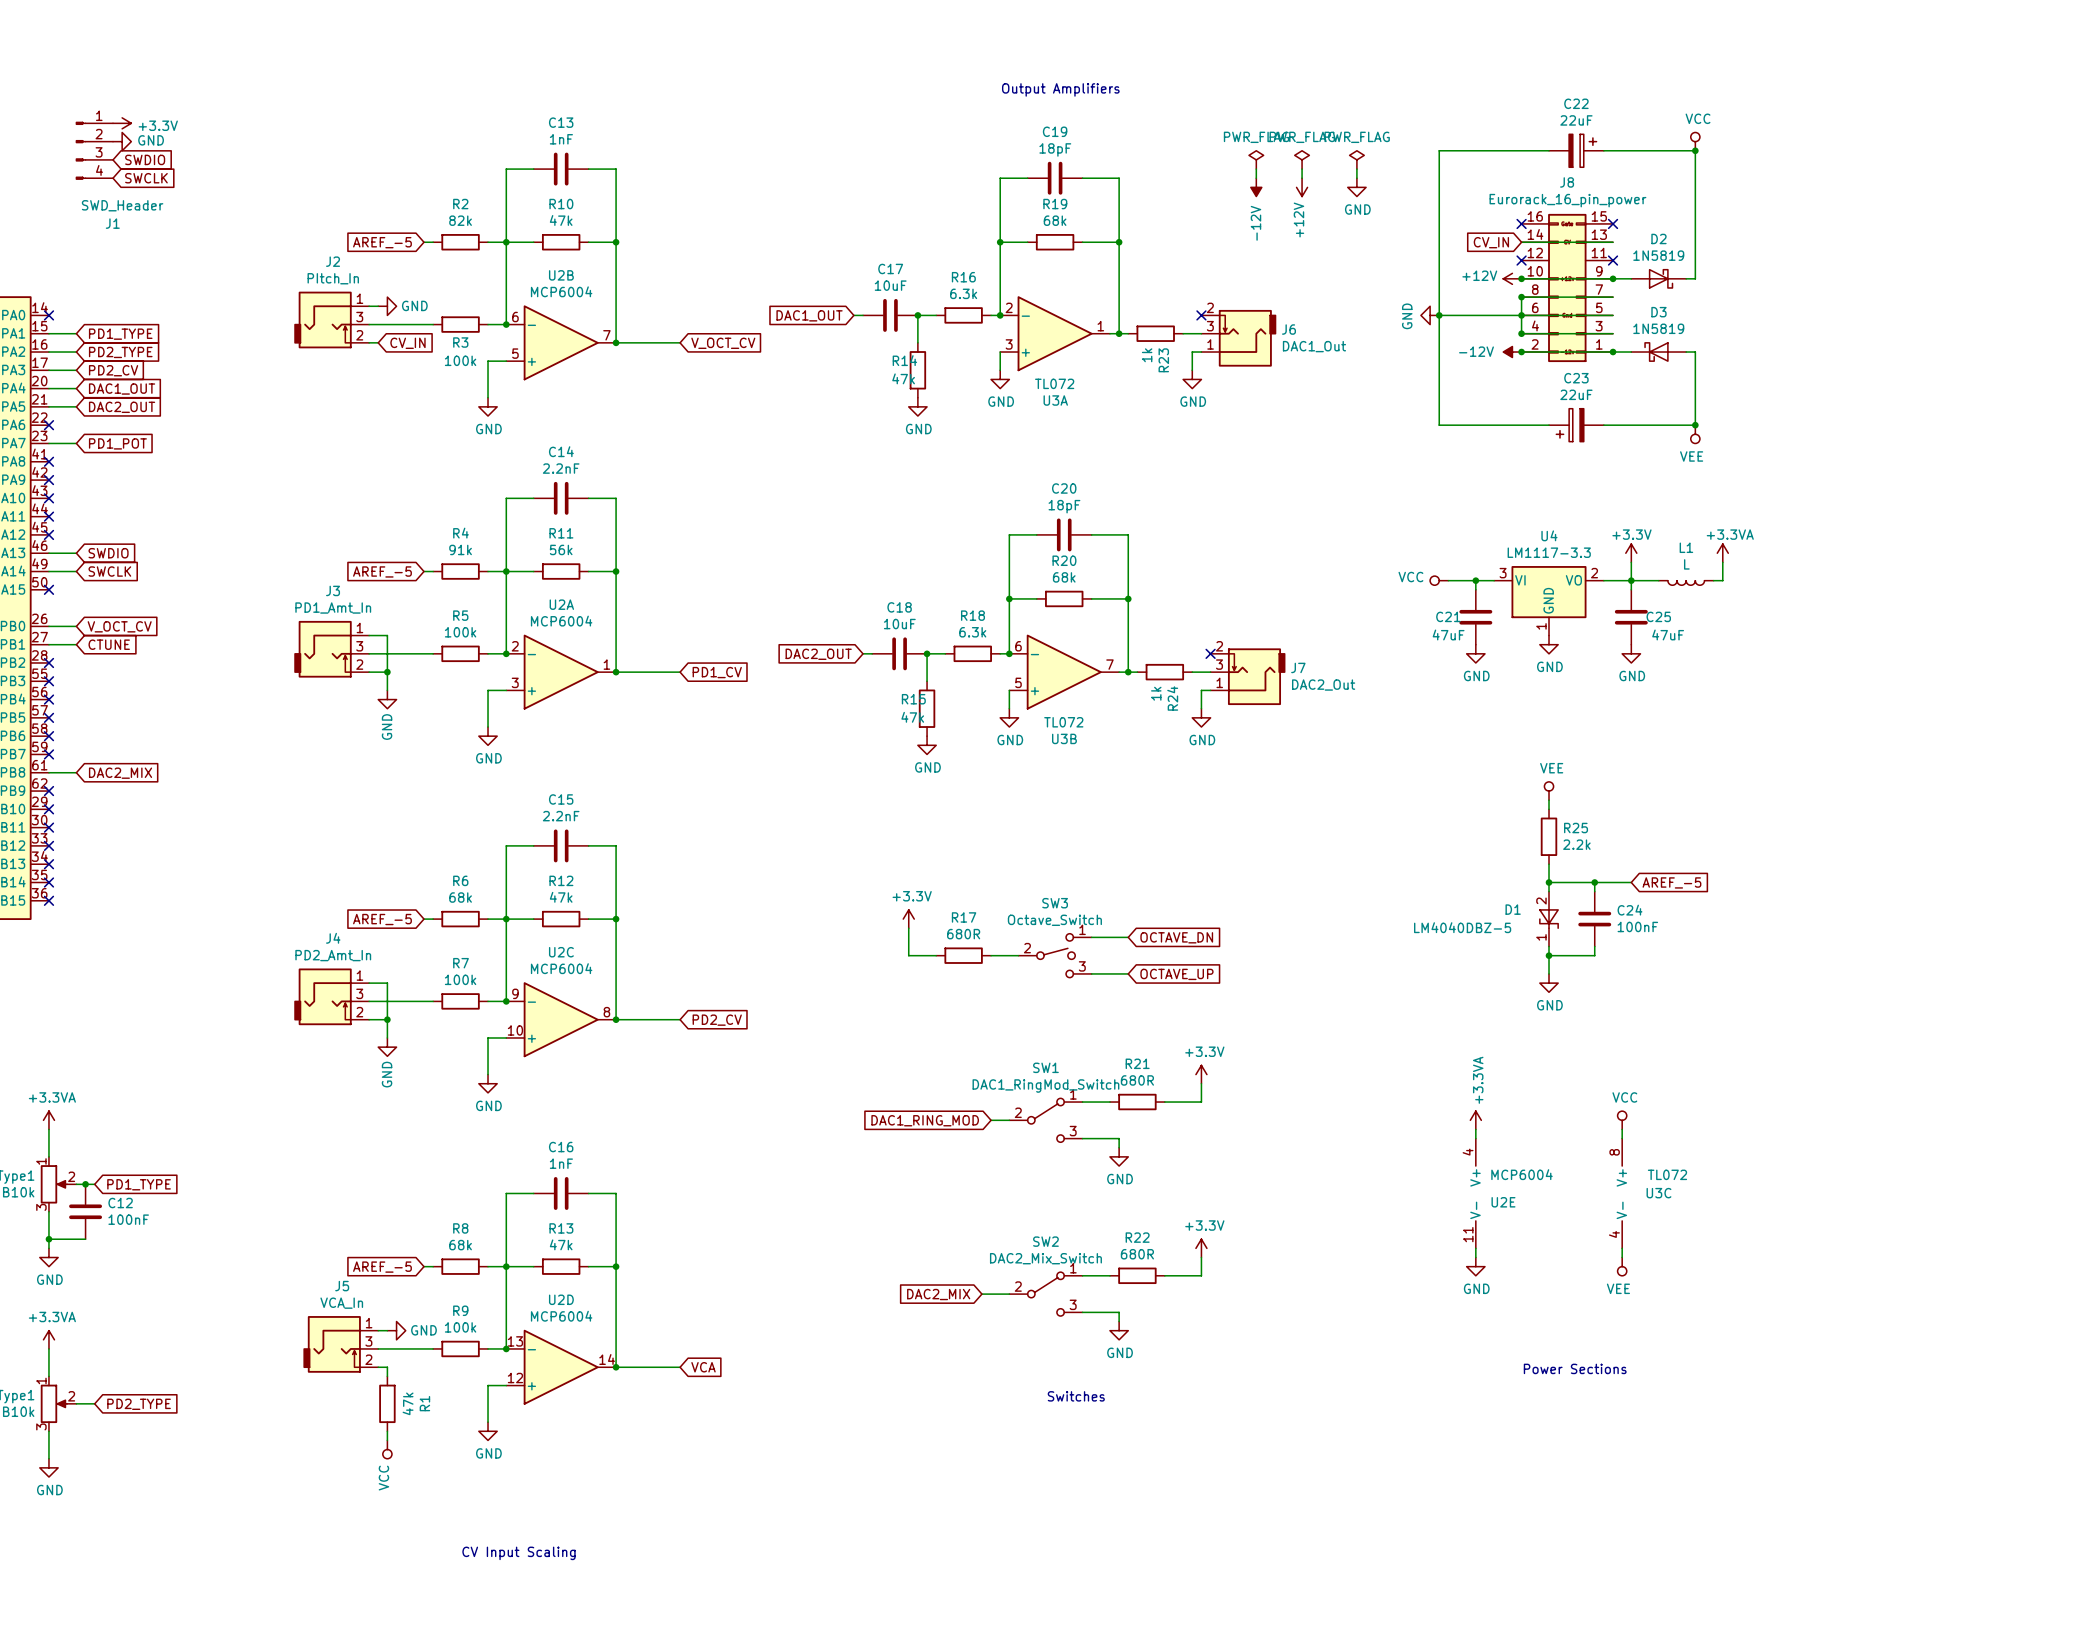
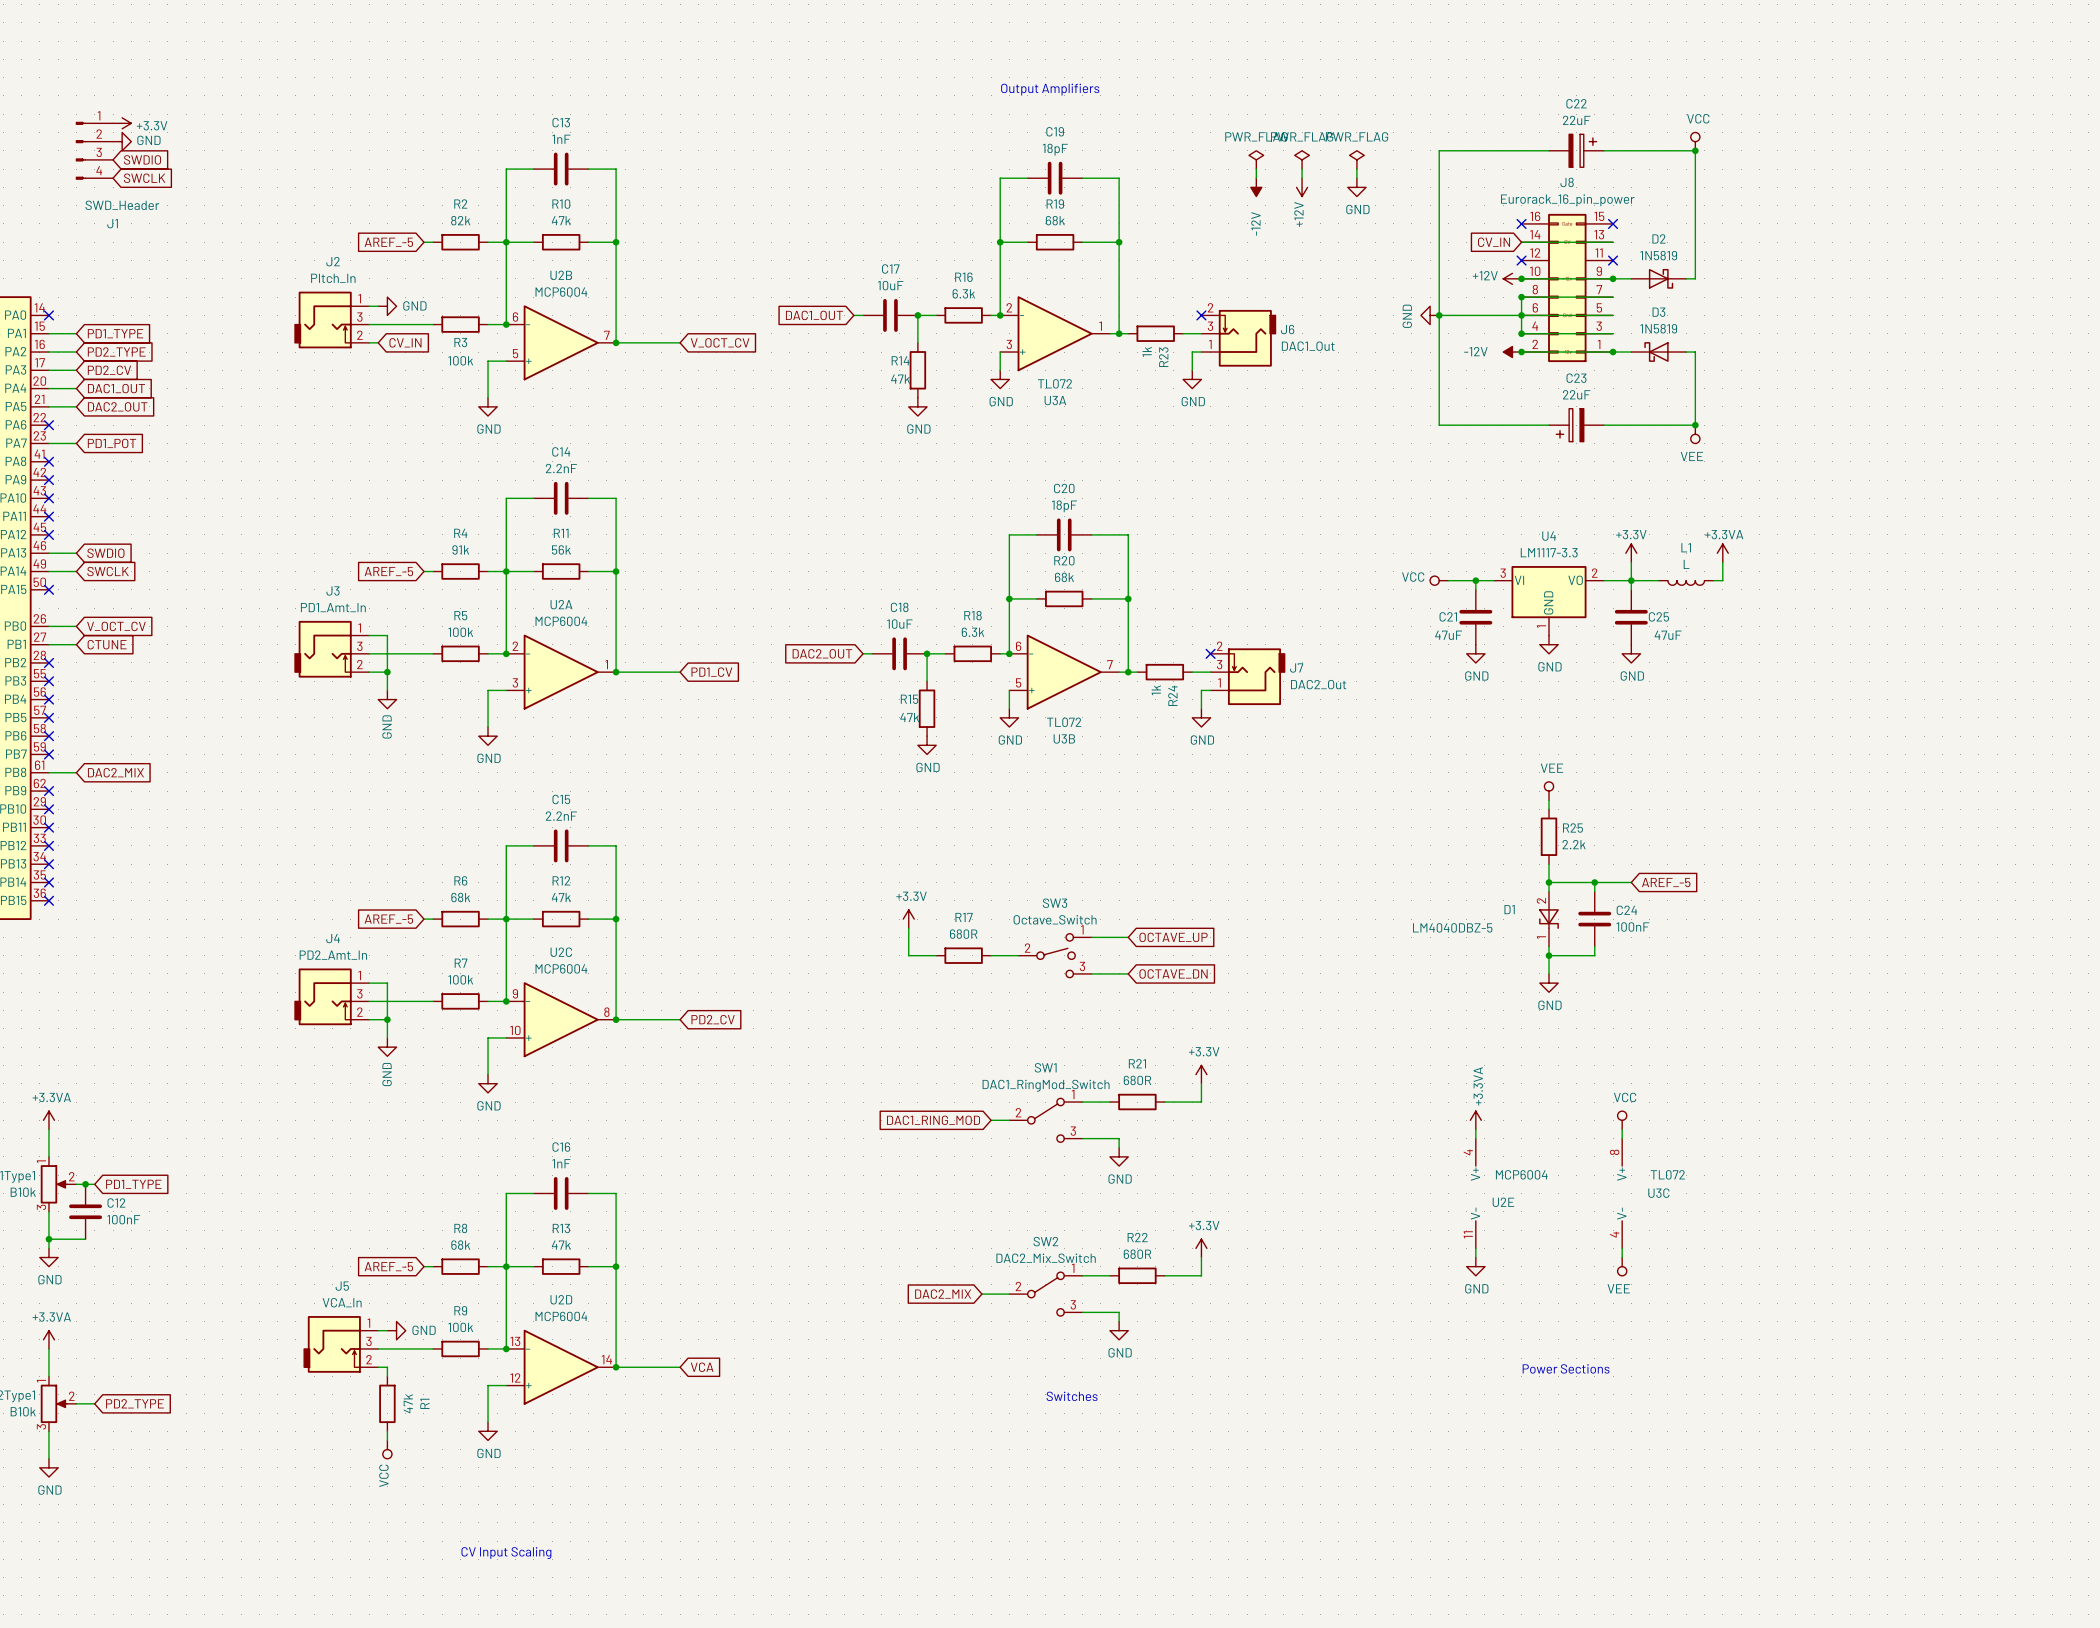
global label: OCTAVE_DN (1176, 937) -> OCTAVE_UP (1173, 937)
global label: OCTAVE_UP (1176, 974) -> OCTAVE_DN (1173, 973)

